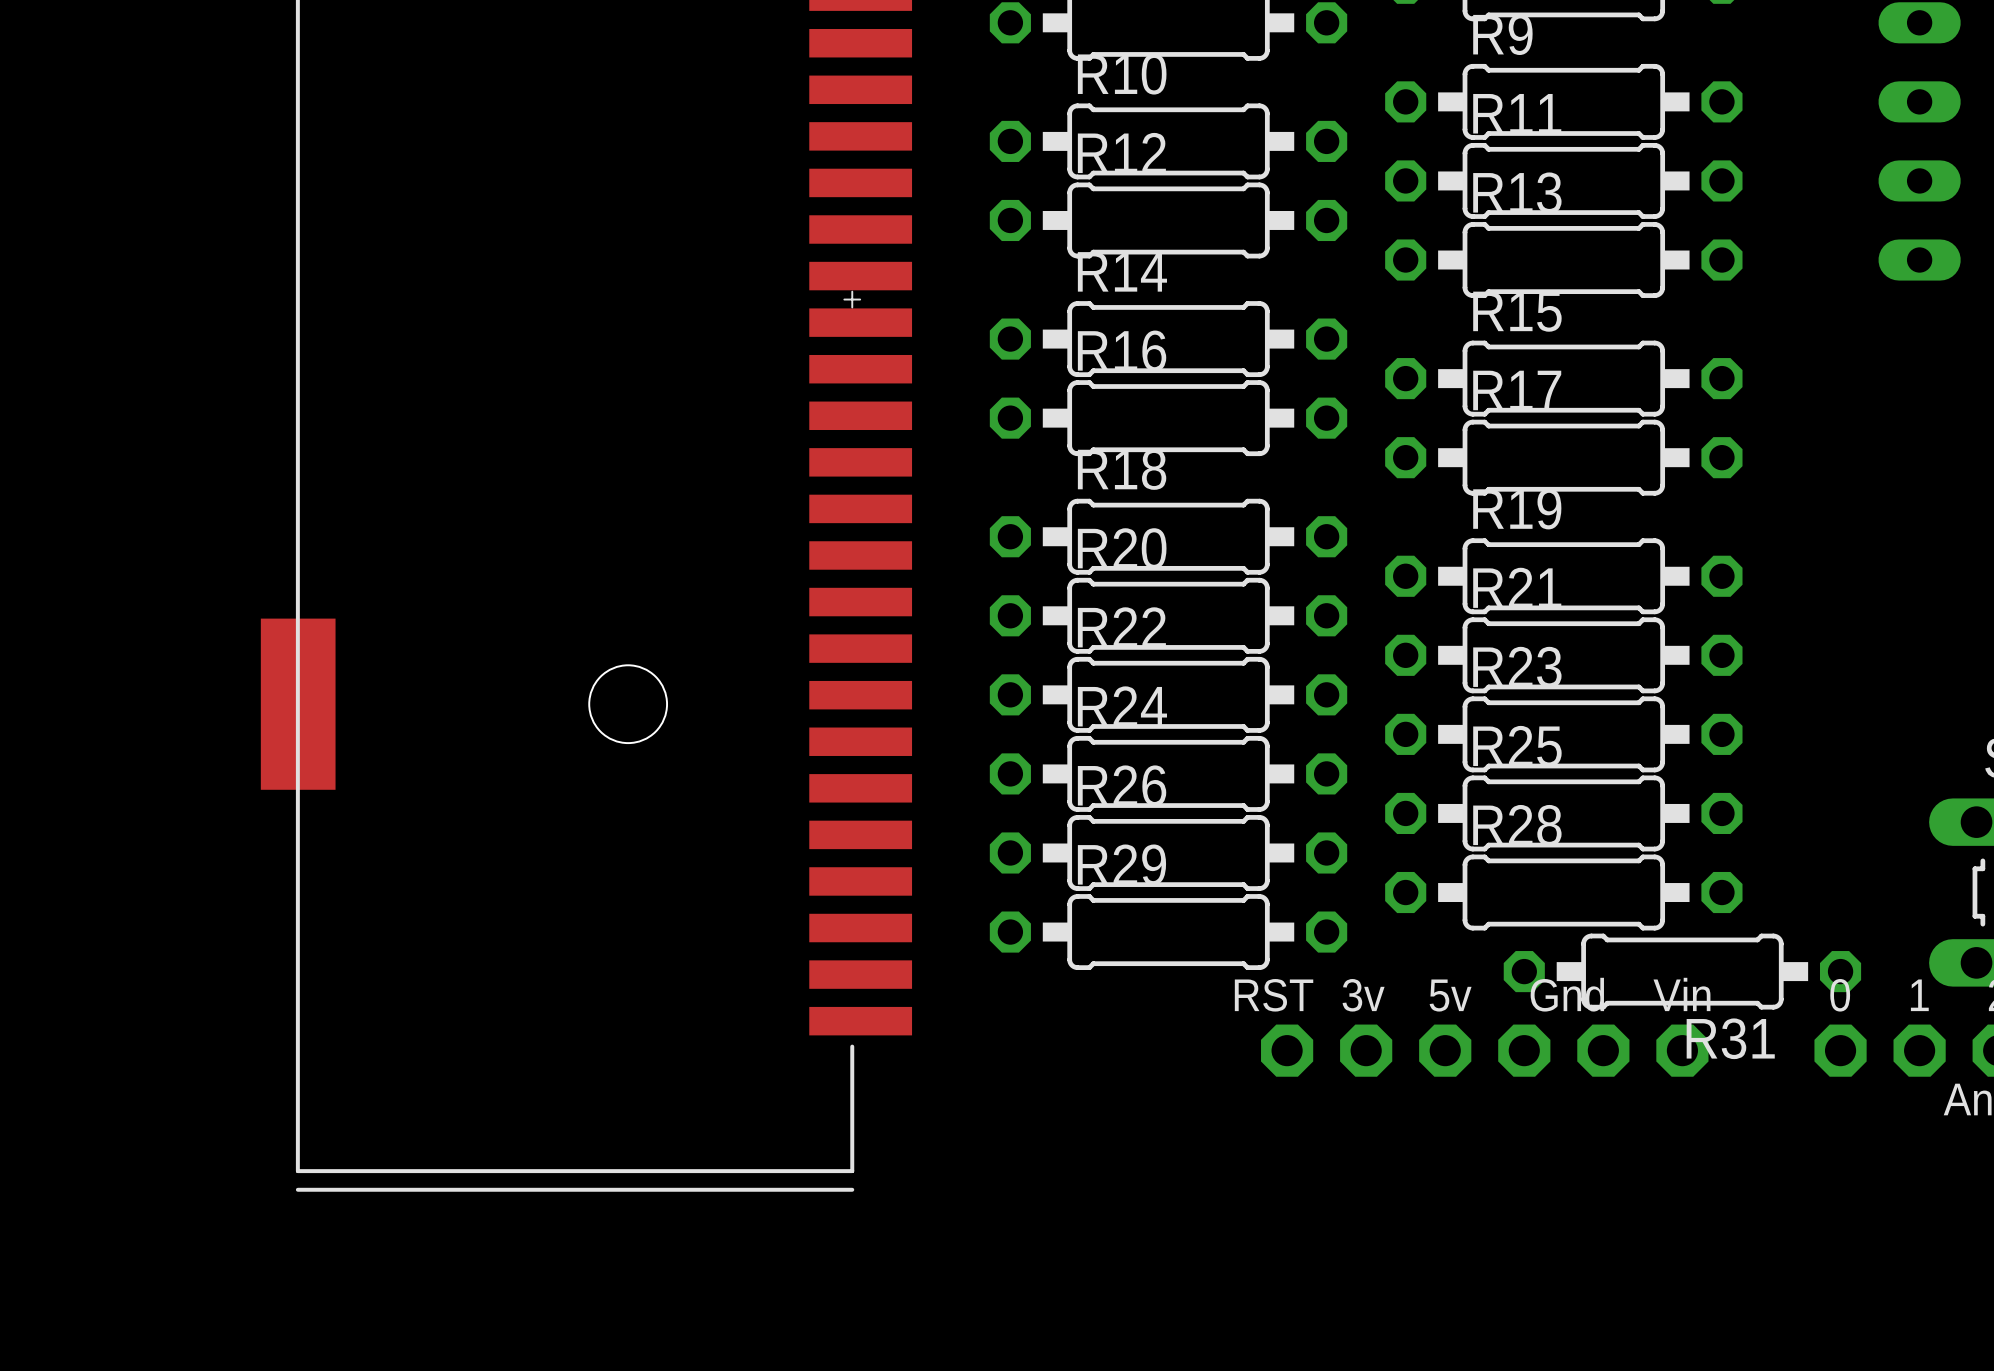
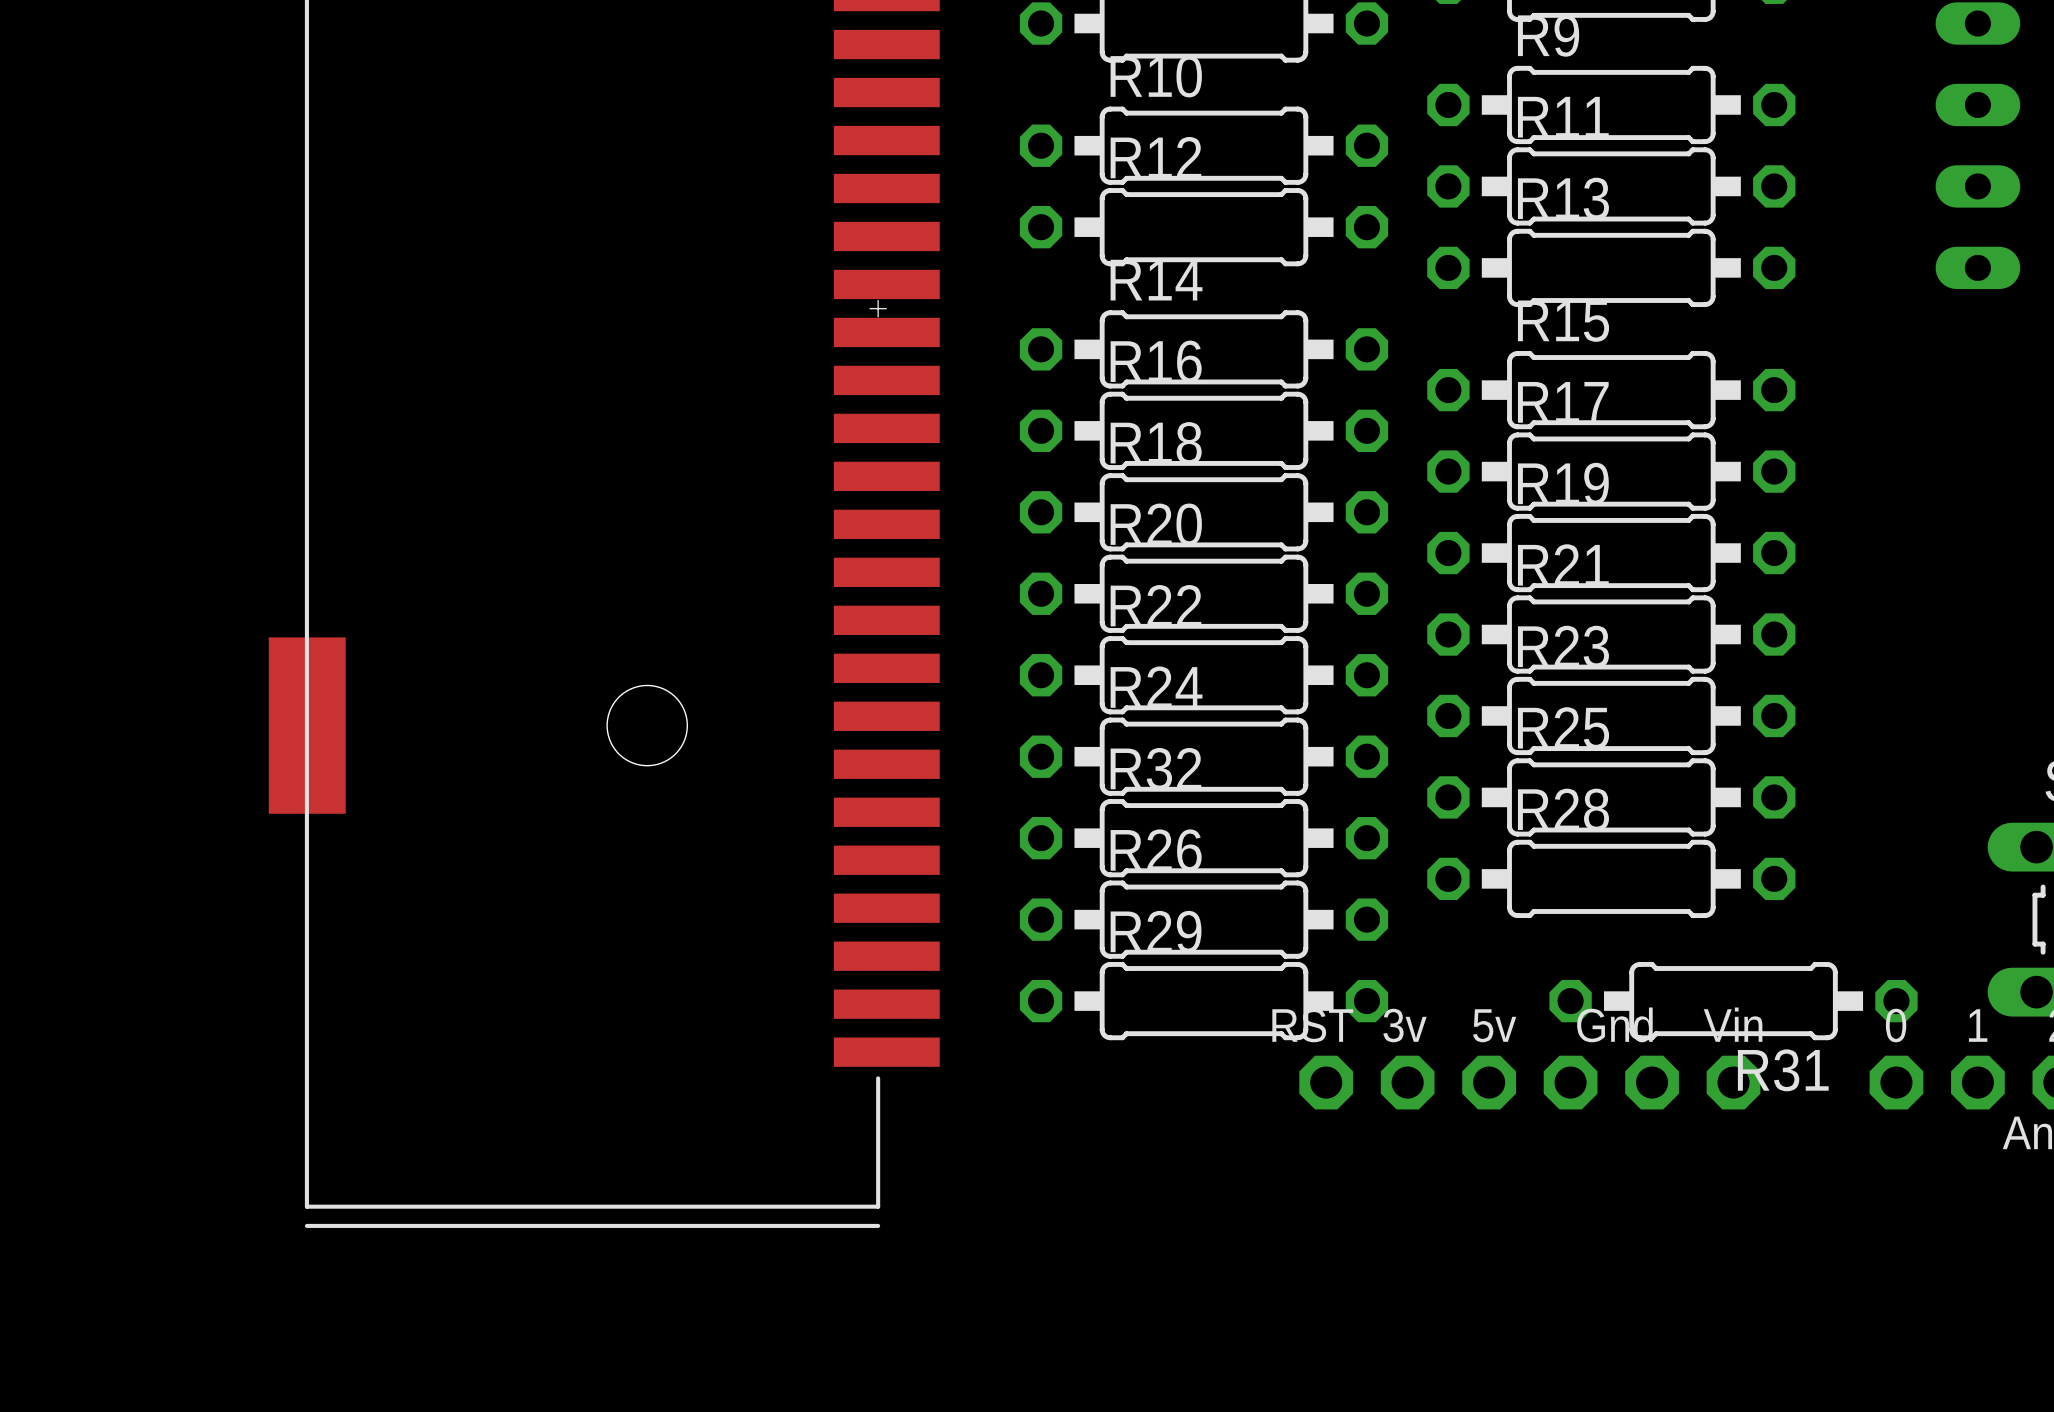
R18 position: (1168, 536) -> (1204, 512)
R19 position: (1563, 576) -> (1611, 553)
R20 position: (1168, 615) -> (1204, 593)
R21 position: (1563, 655) -> (1611, 634)
R22 position: (1168, 694) -> (1204, 675)
R23 position: (1563, 734) -> (1611, 715)
R24 position: (1168, 773) -> (1204, 756)
R32: none -> (1204, 838)
R25 position: (1563, 813) -> (1611, 797)
R26 position: (1168, 852) -> (1204, 919)
R28 position: (1563, 892) -> (1611, 878)
R29 position: (1168, 932) -> (1204, 1001)

